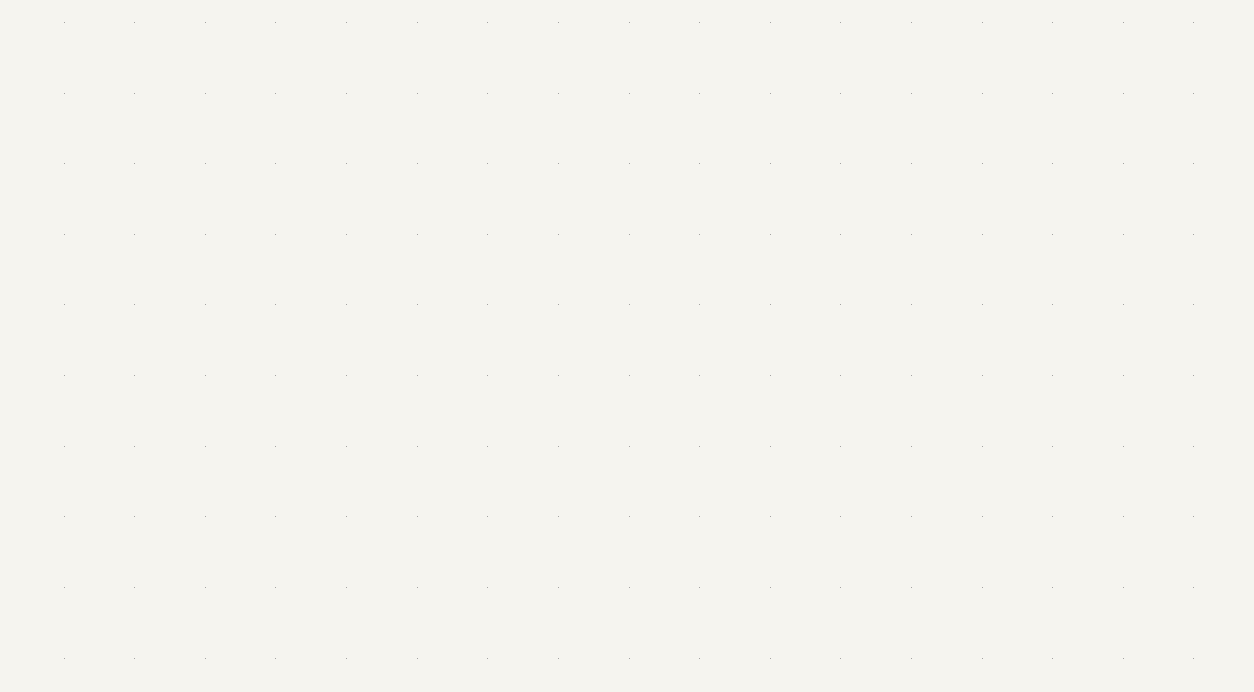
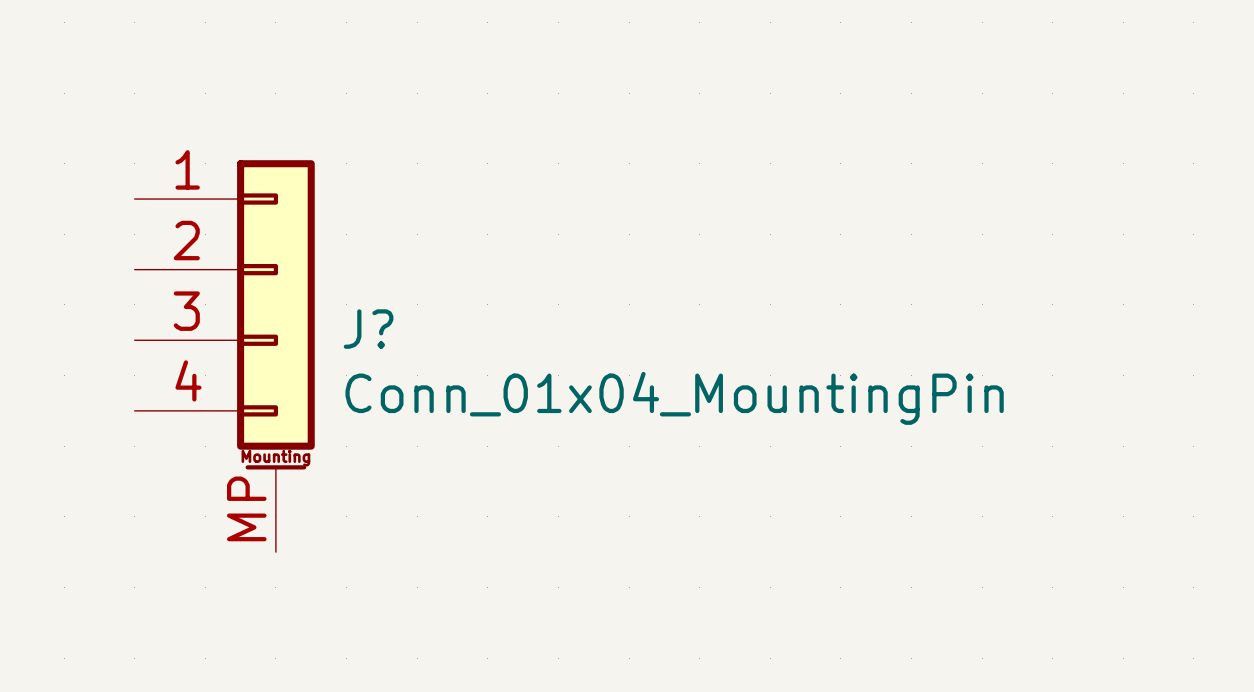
J?: none -> Conn_01x04_MountingPin (224, 356)

